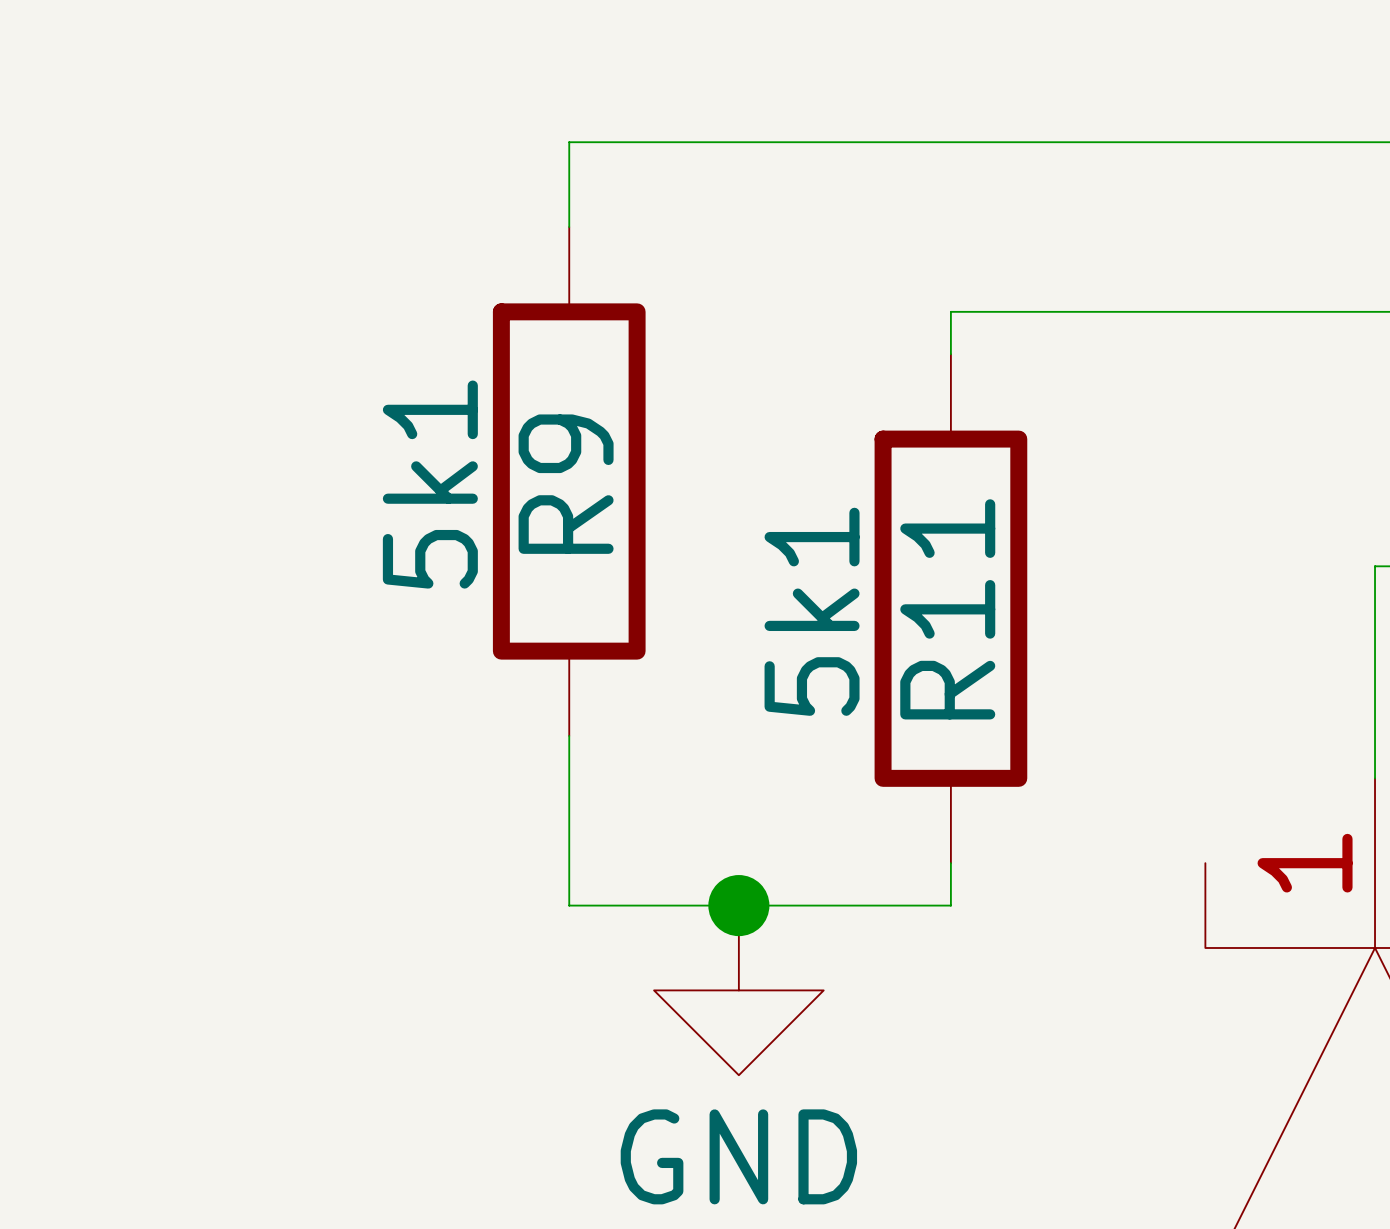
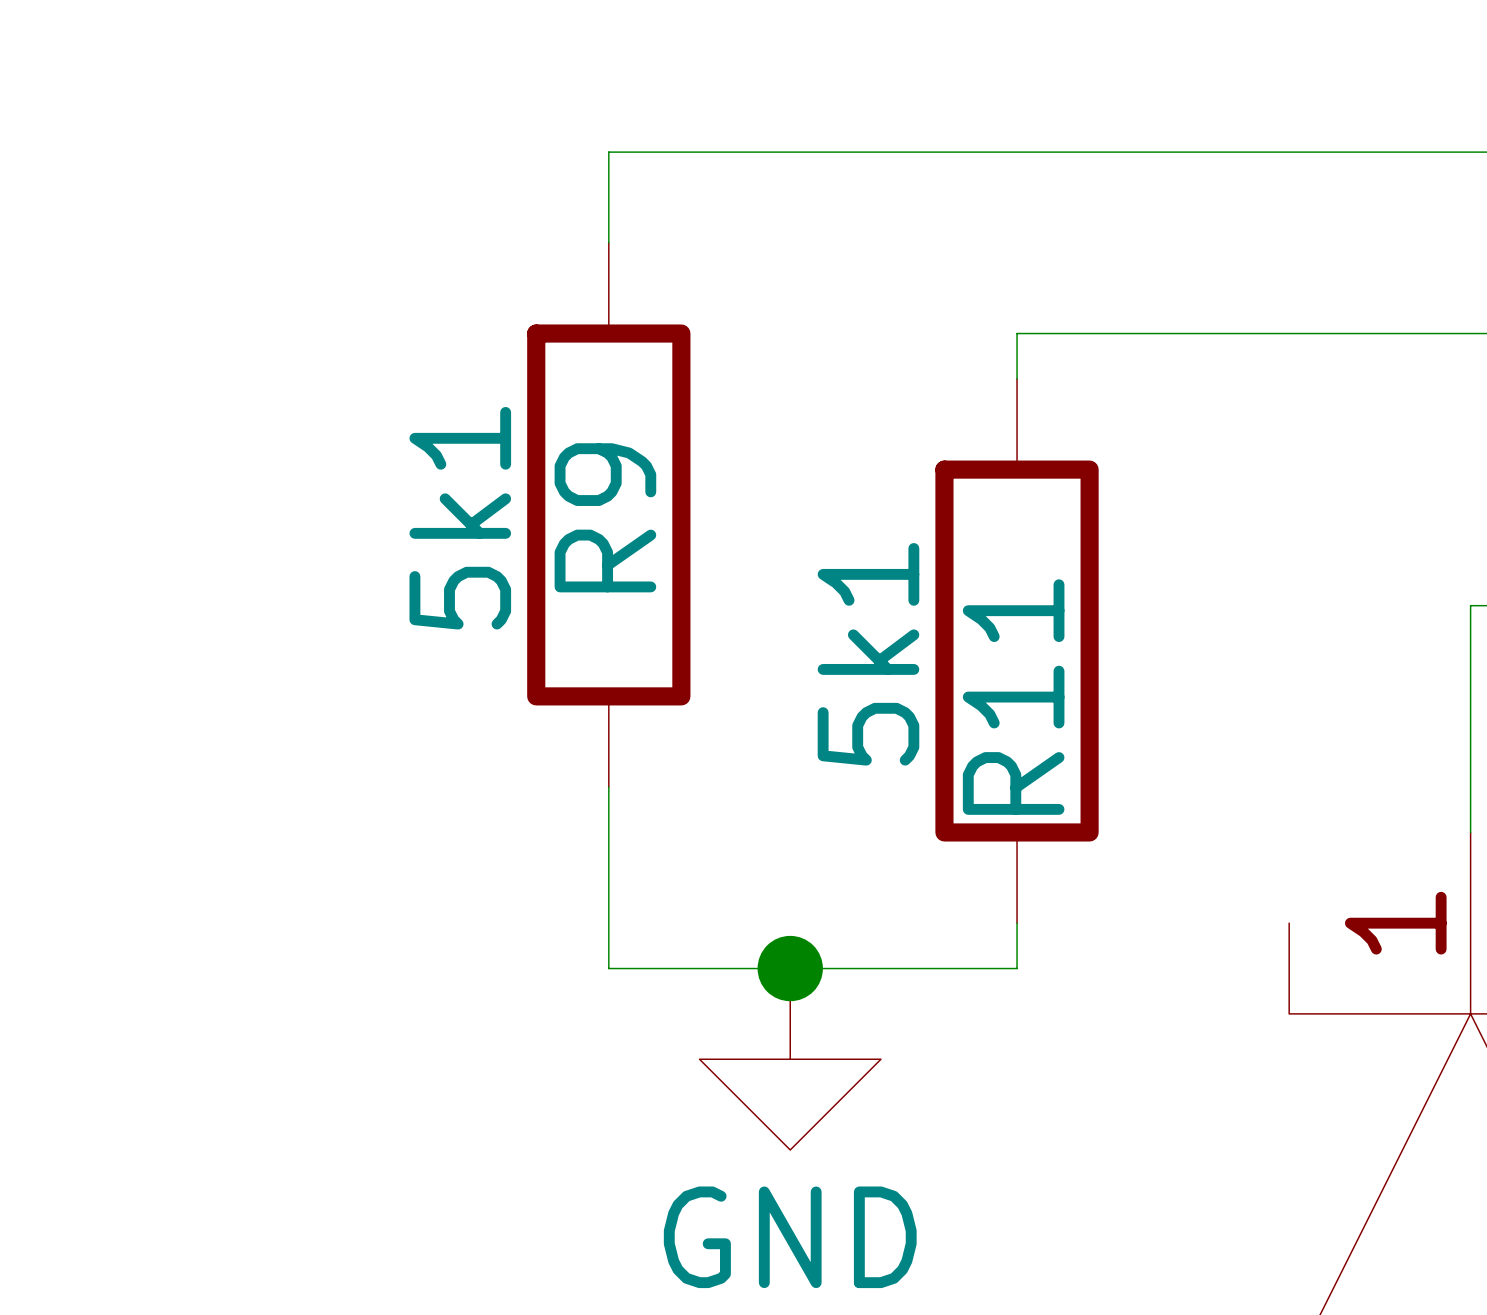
R11 name position: R11 (947, 609) -> R11 (1013, 697)

